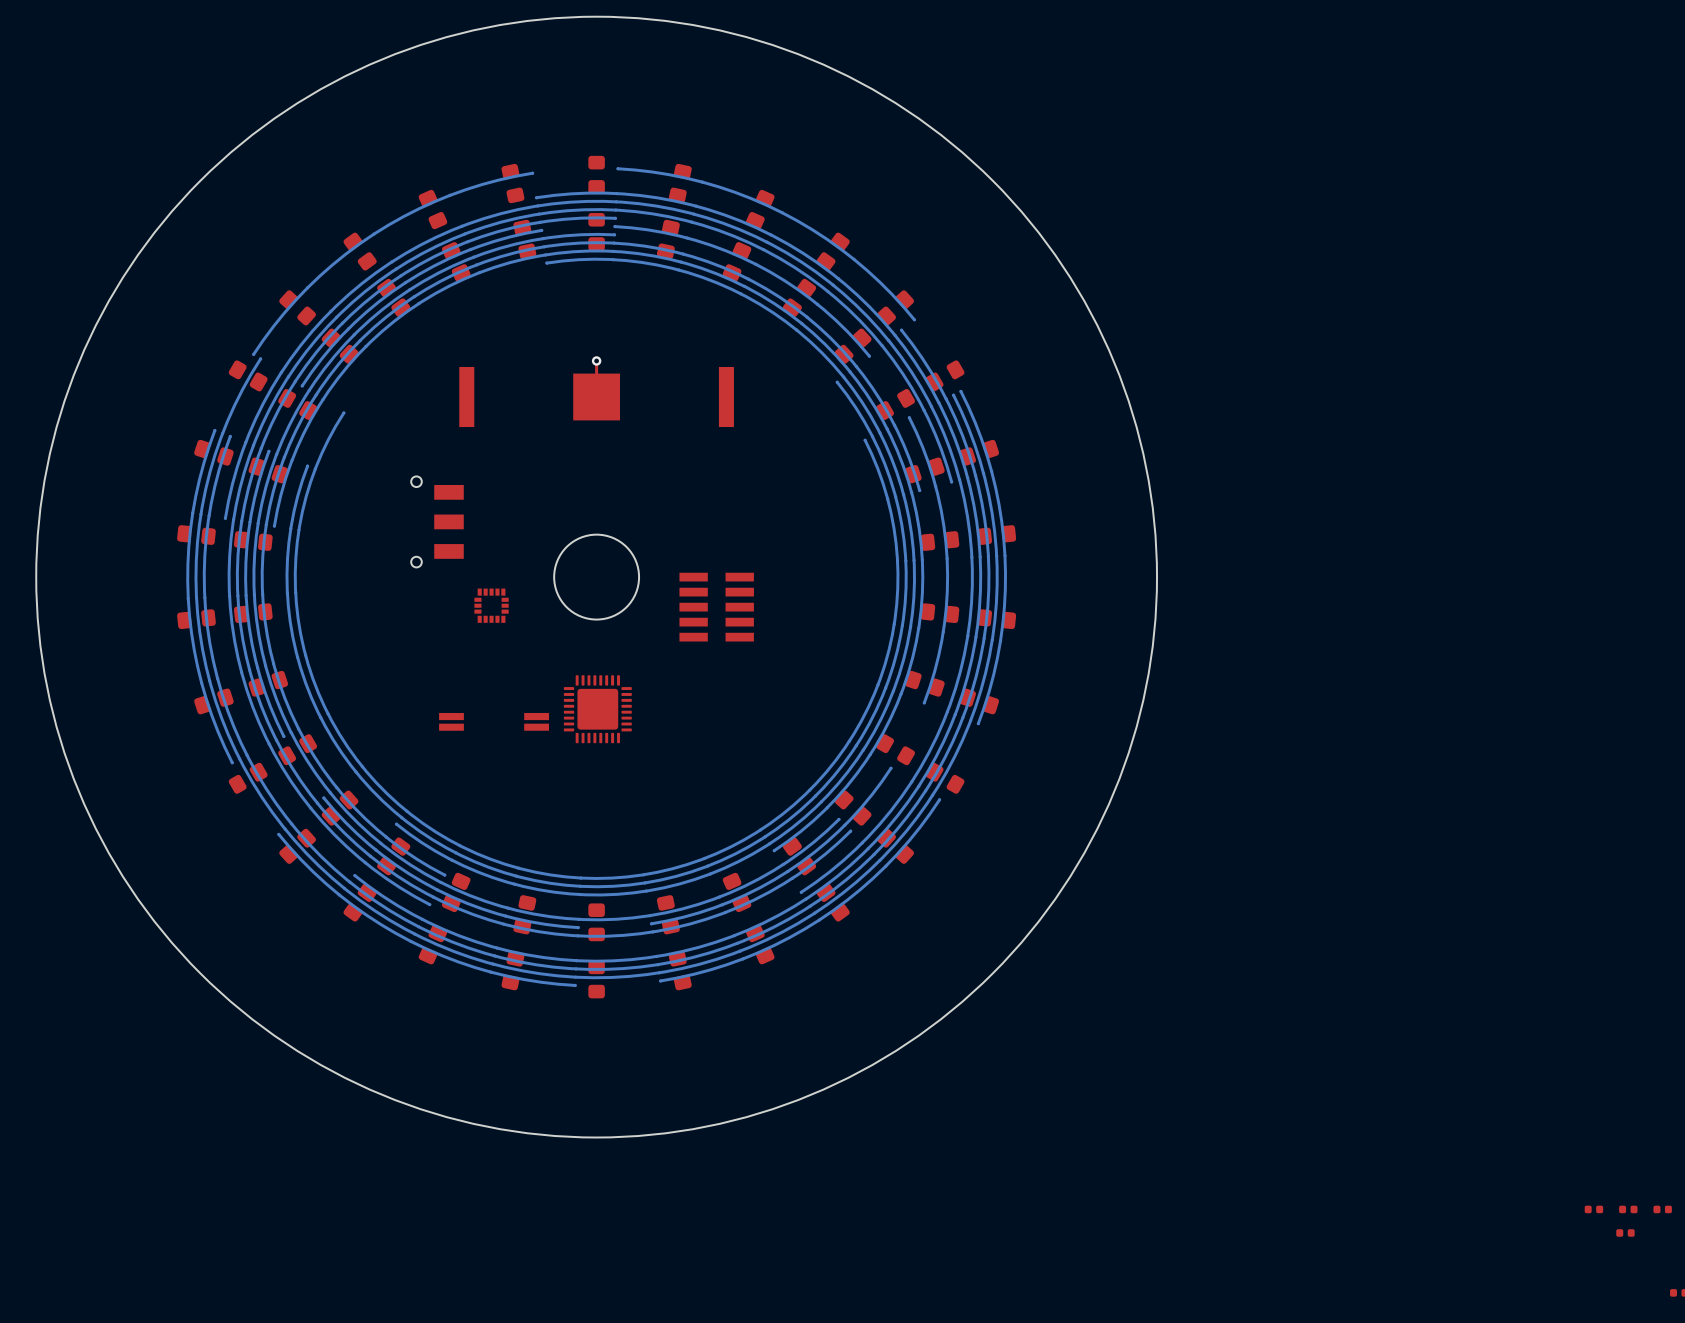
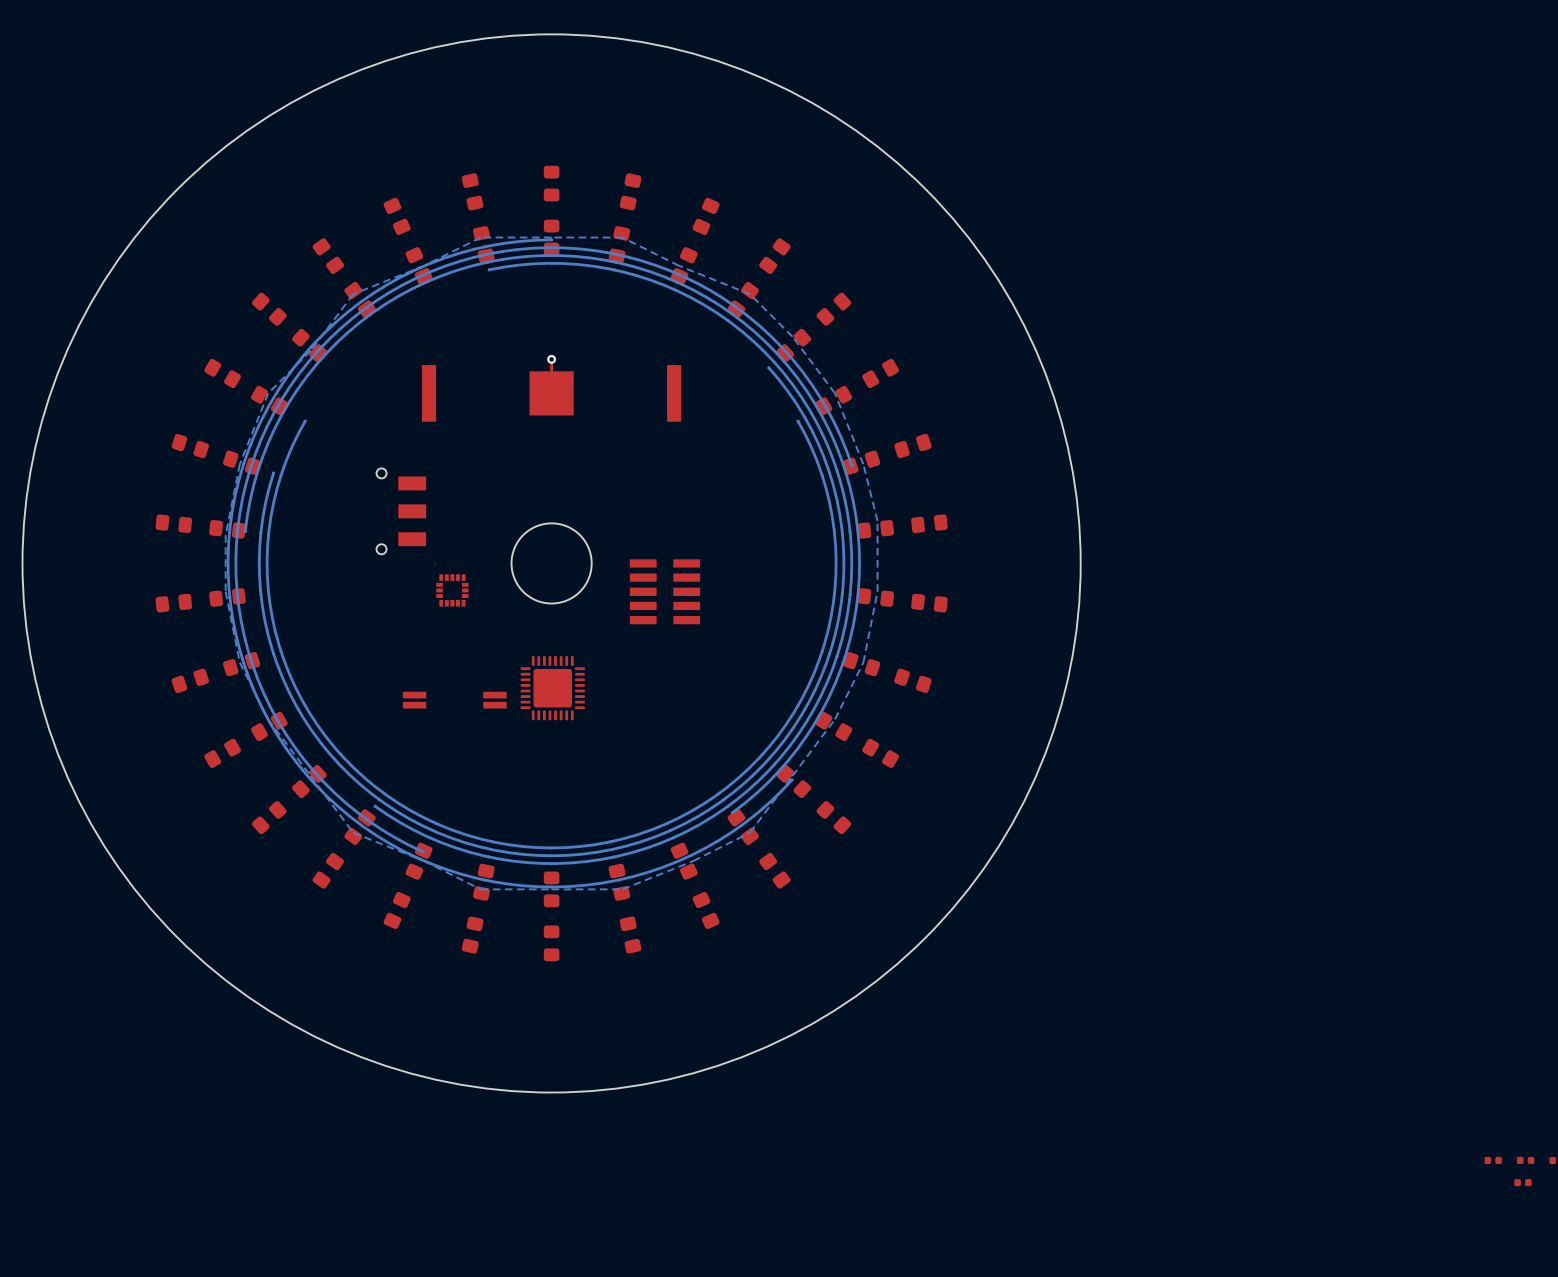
part footprint: [186, 167, 1007, 988] -> [226, 238, 861, 889]
bottom zone outline: none -> (622, 237) (480, 237) (424, 265) (353, 294) (310, 350) (268, 393) (239, 464) (225, 535) (225, 591) (239, 662) (268, 719) (353, 832) (424, 861) (480, 889) (622, 889) (693, 861) (750, 832) (835, 719) (863, 662) (877, 591) (877, 520) (863, 464) (835, 393) (792, 336) (750, 294) (679, 265) (622, 237)

